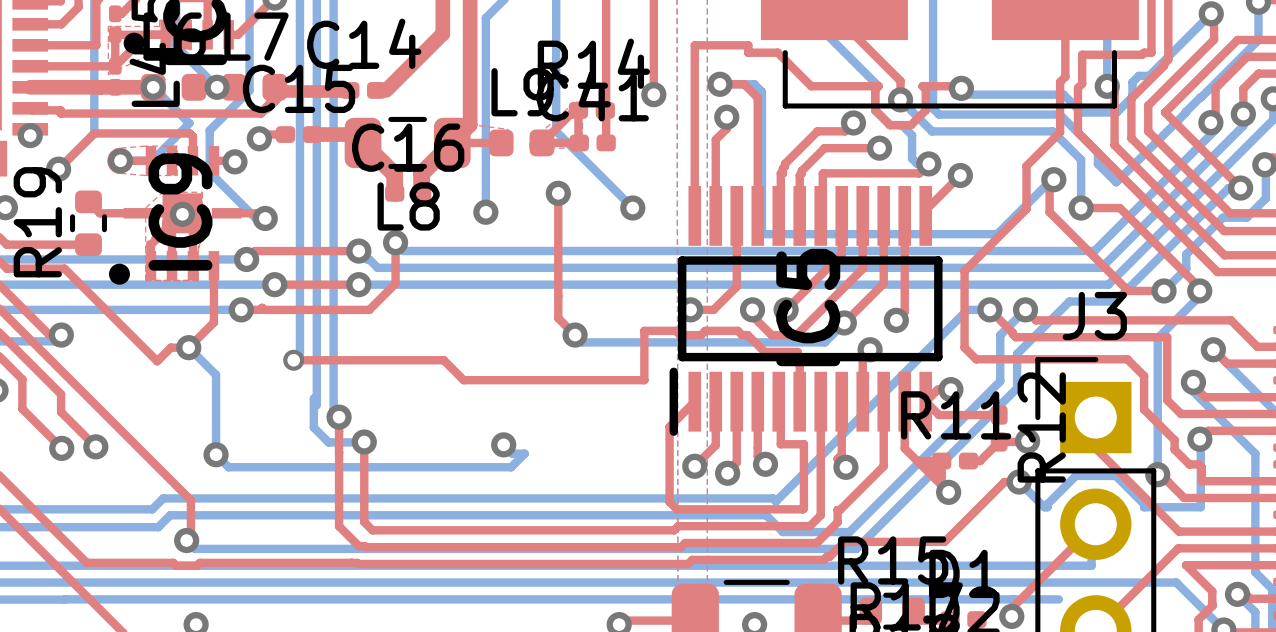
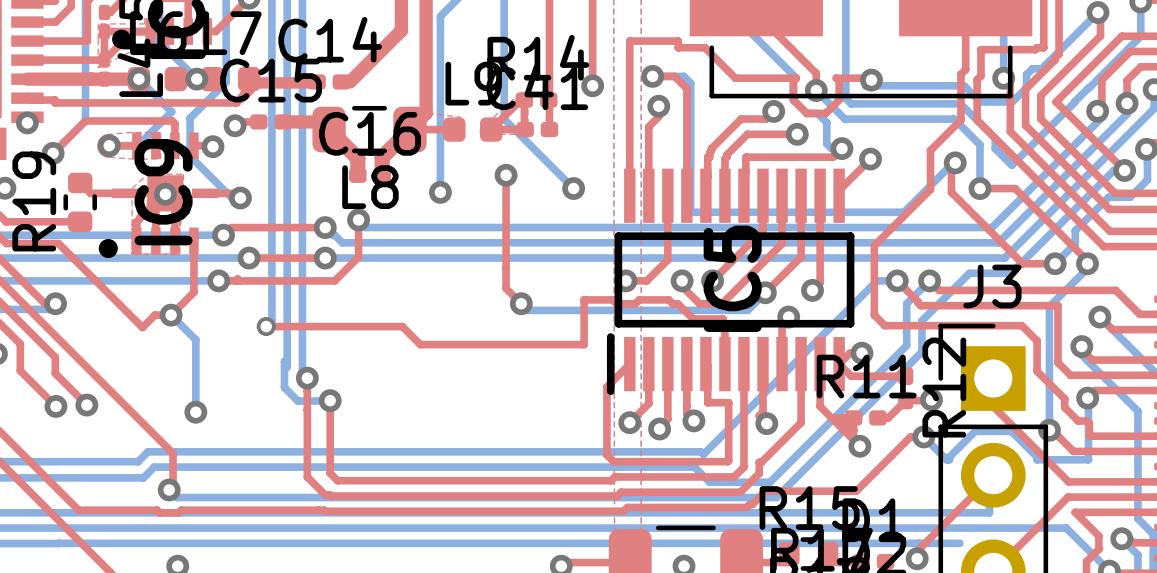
bottom track: (503, 444) (512, 453) (524, 453) (511, 467) (228, 467) (216, 454) -> none
via: (503, 444) -> none

